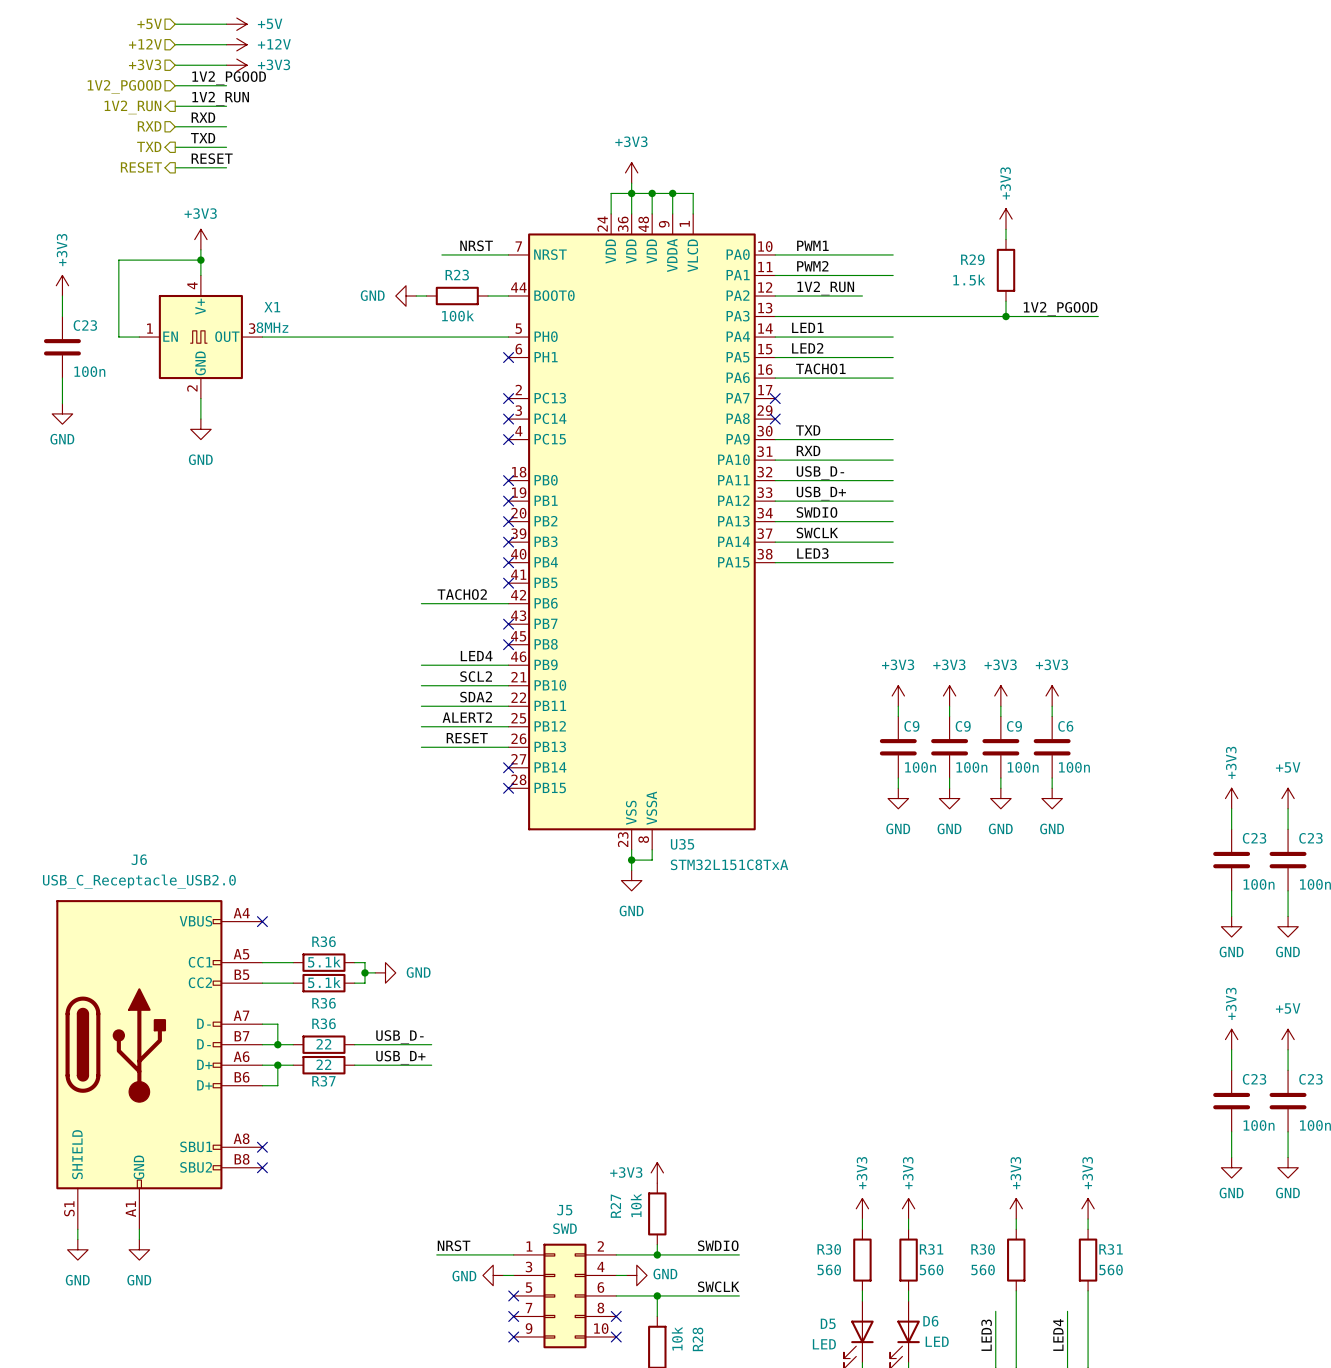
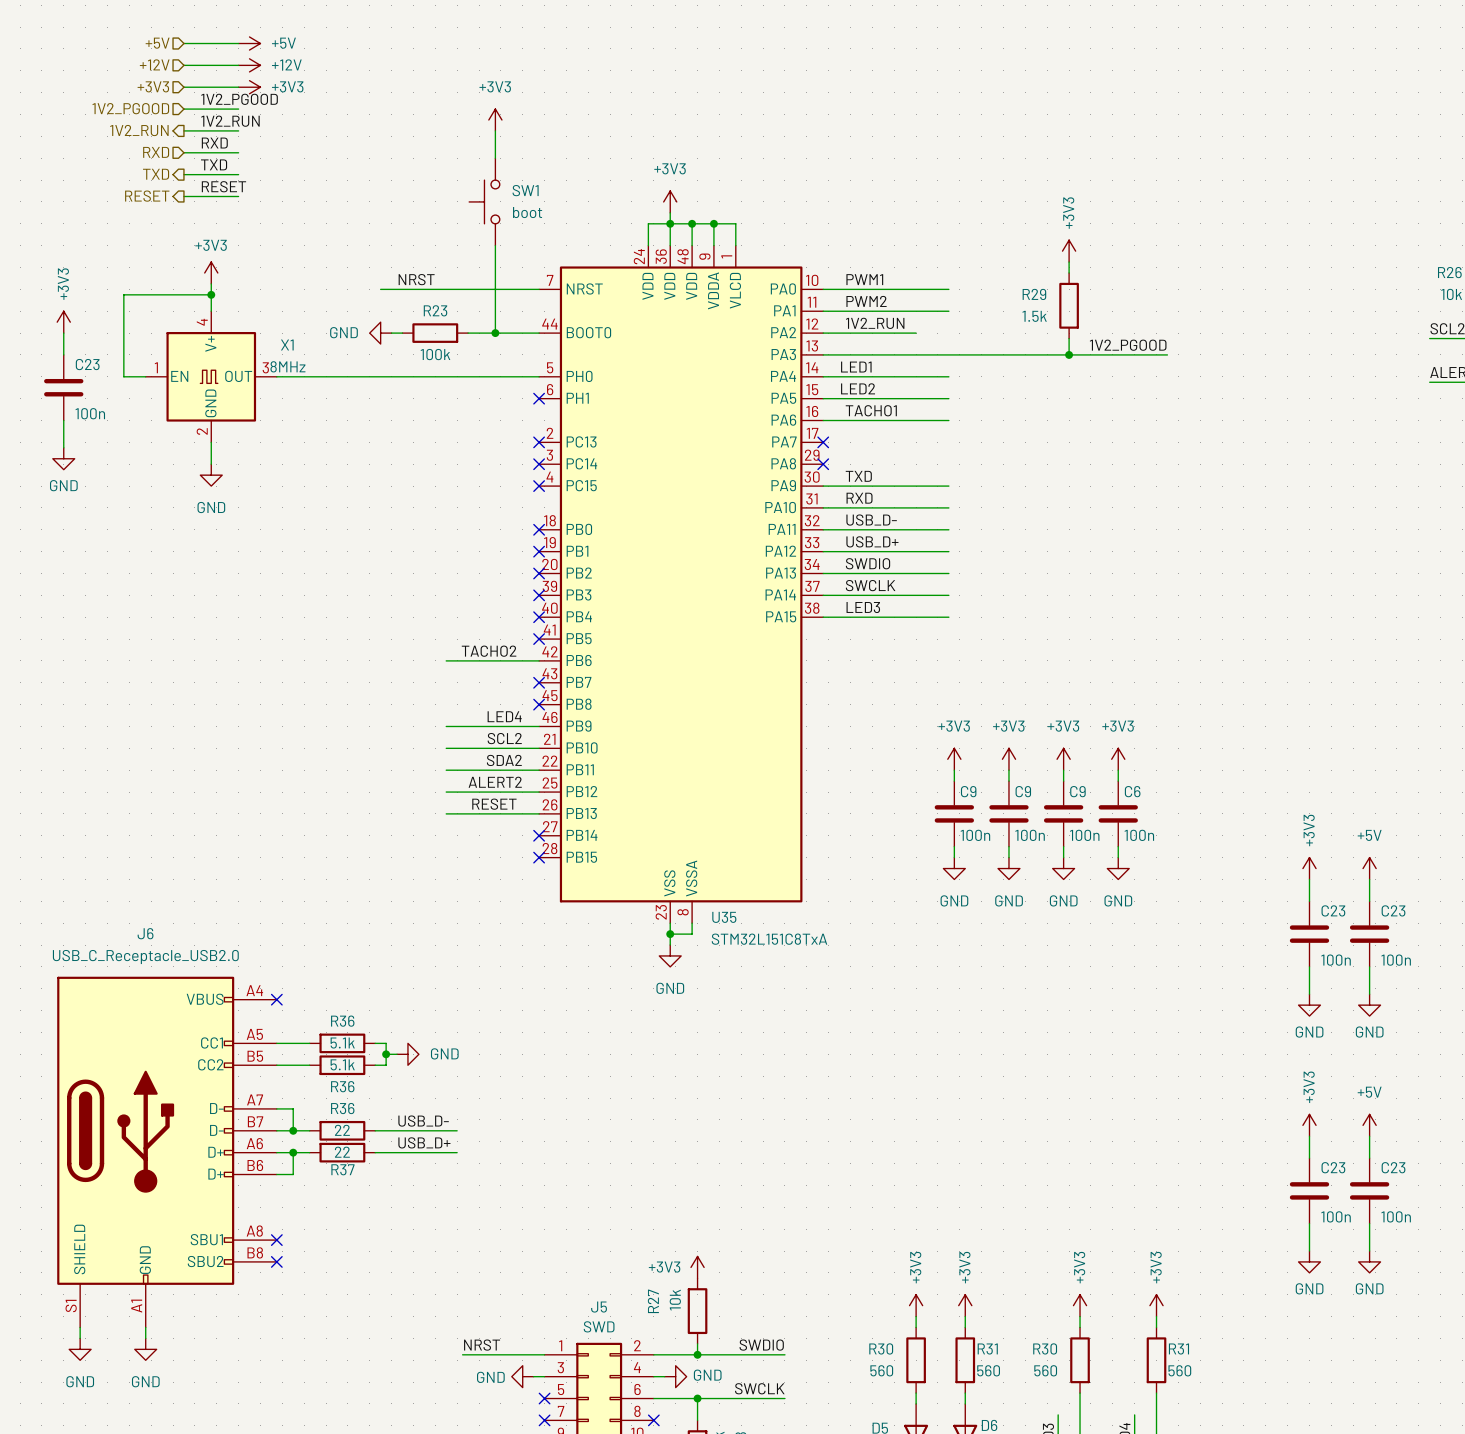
power symbol: none -> +3V3 (495, 120)
wire: none -> (495, 130) (495, 158)
SW1: none -> boot (484, 201)
wire: none -> (495, 245) (495, 333)
label position: NRST (476, 245) -> NRST (416, 279)
wire: none -> (380, 289) (468, 289)
power symbol position: GND (406, 296) -> GND (380, 333)
wire: (416, 296) (426, 296) -> (391, 333) (402, 333)
wire: none -> (468, 333) (517, 333)
R23 position: (457, 296) -> (435, 333)
junction: none -> (495, 333)

